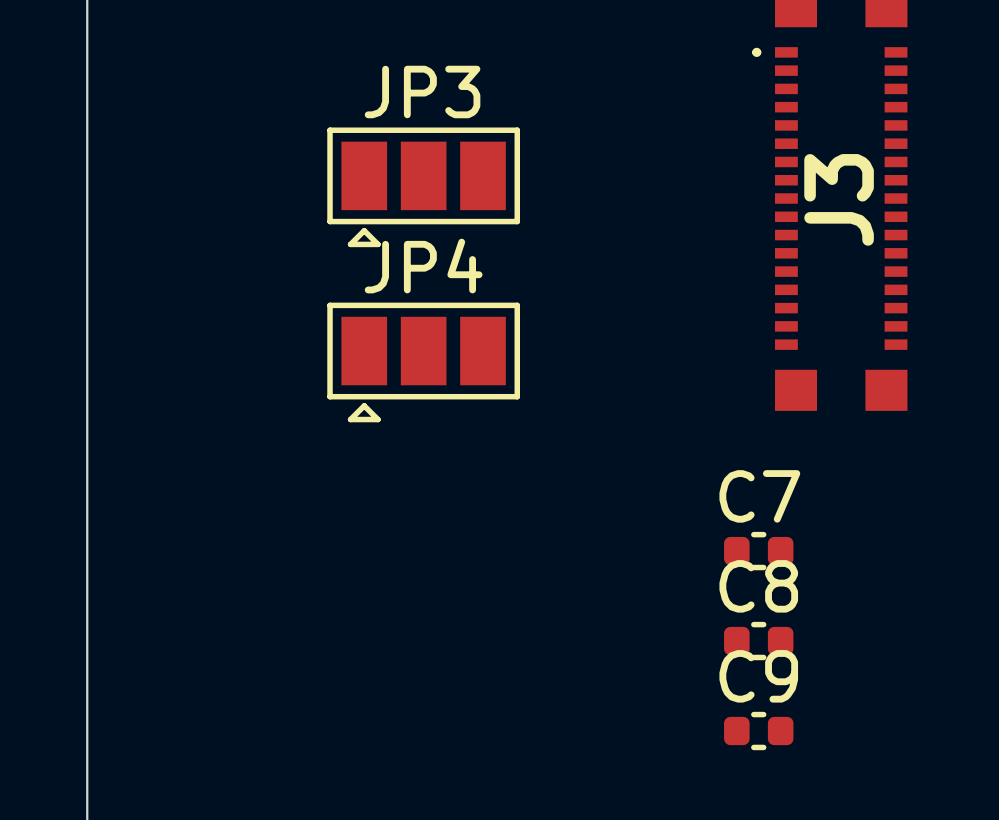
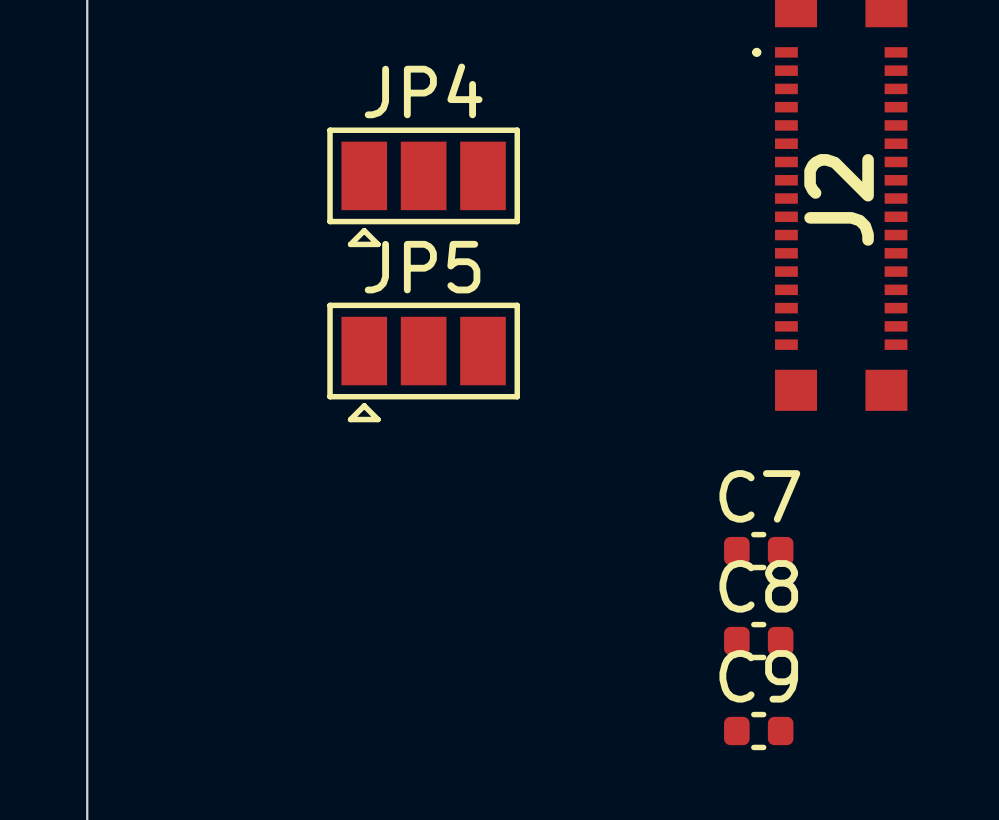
JP3 name: JP3 (422, 91) -> JP4 (423, 90)
J3 name: J3 (839, 199) -> J2 (839, 199)
JP4 name: JP4 (423, 266) -> JP5 (422, 267)

